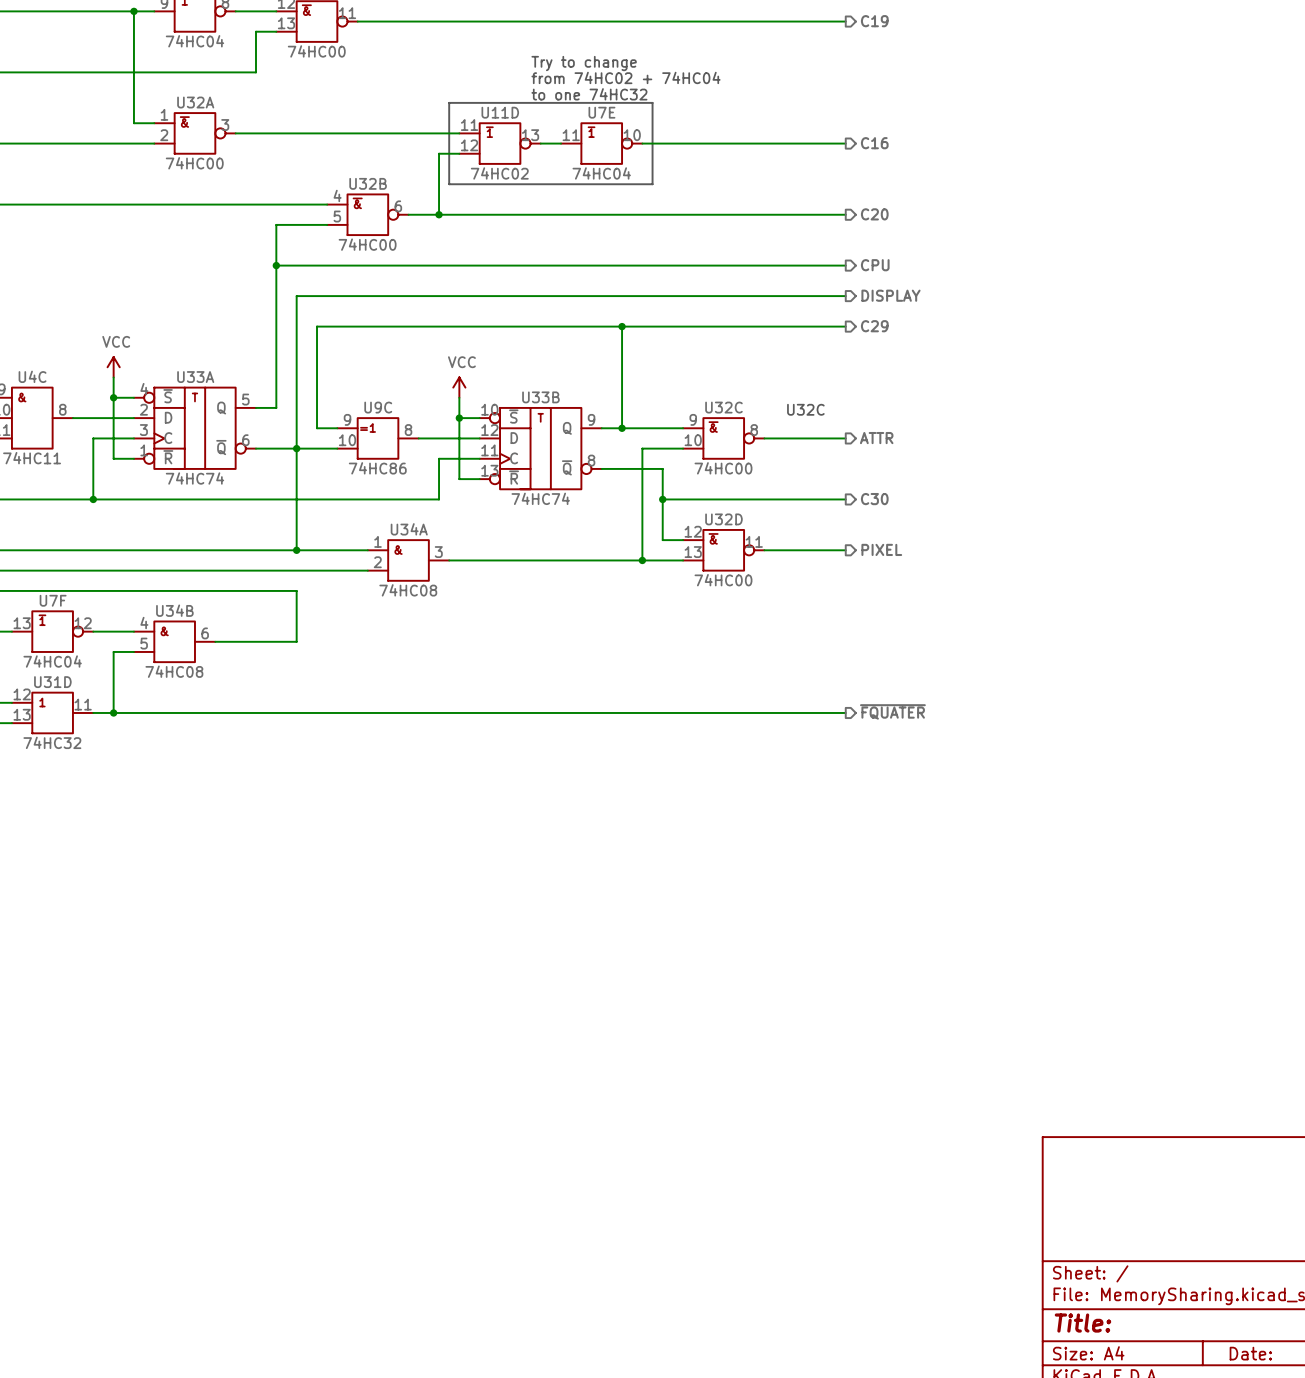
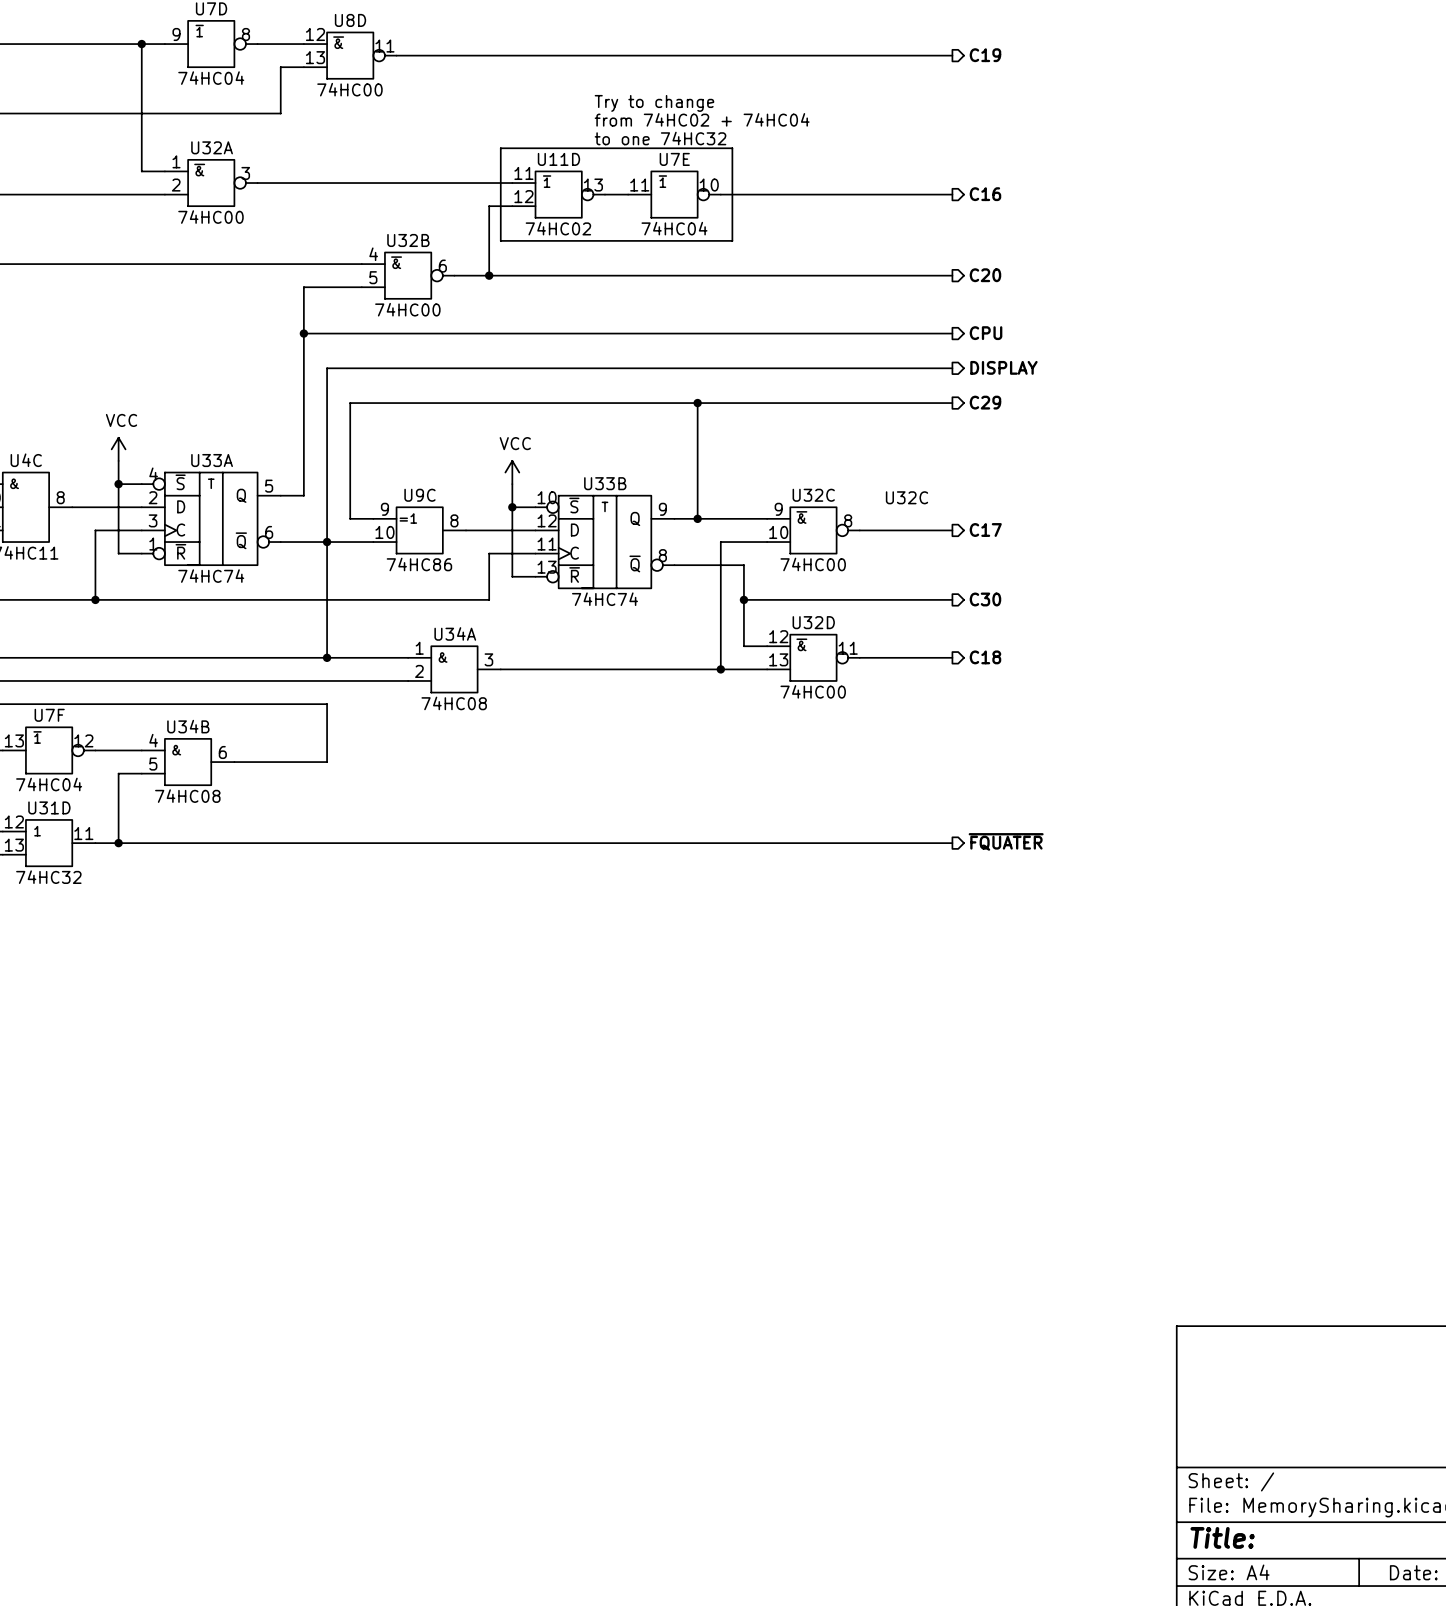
hierarchical label: ATTR (876, 438) -> C17 (985, 530)
hierarchical label: PIXEL (881, 549) -> C18 (985, 657)

